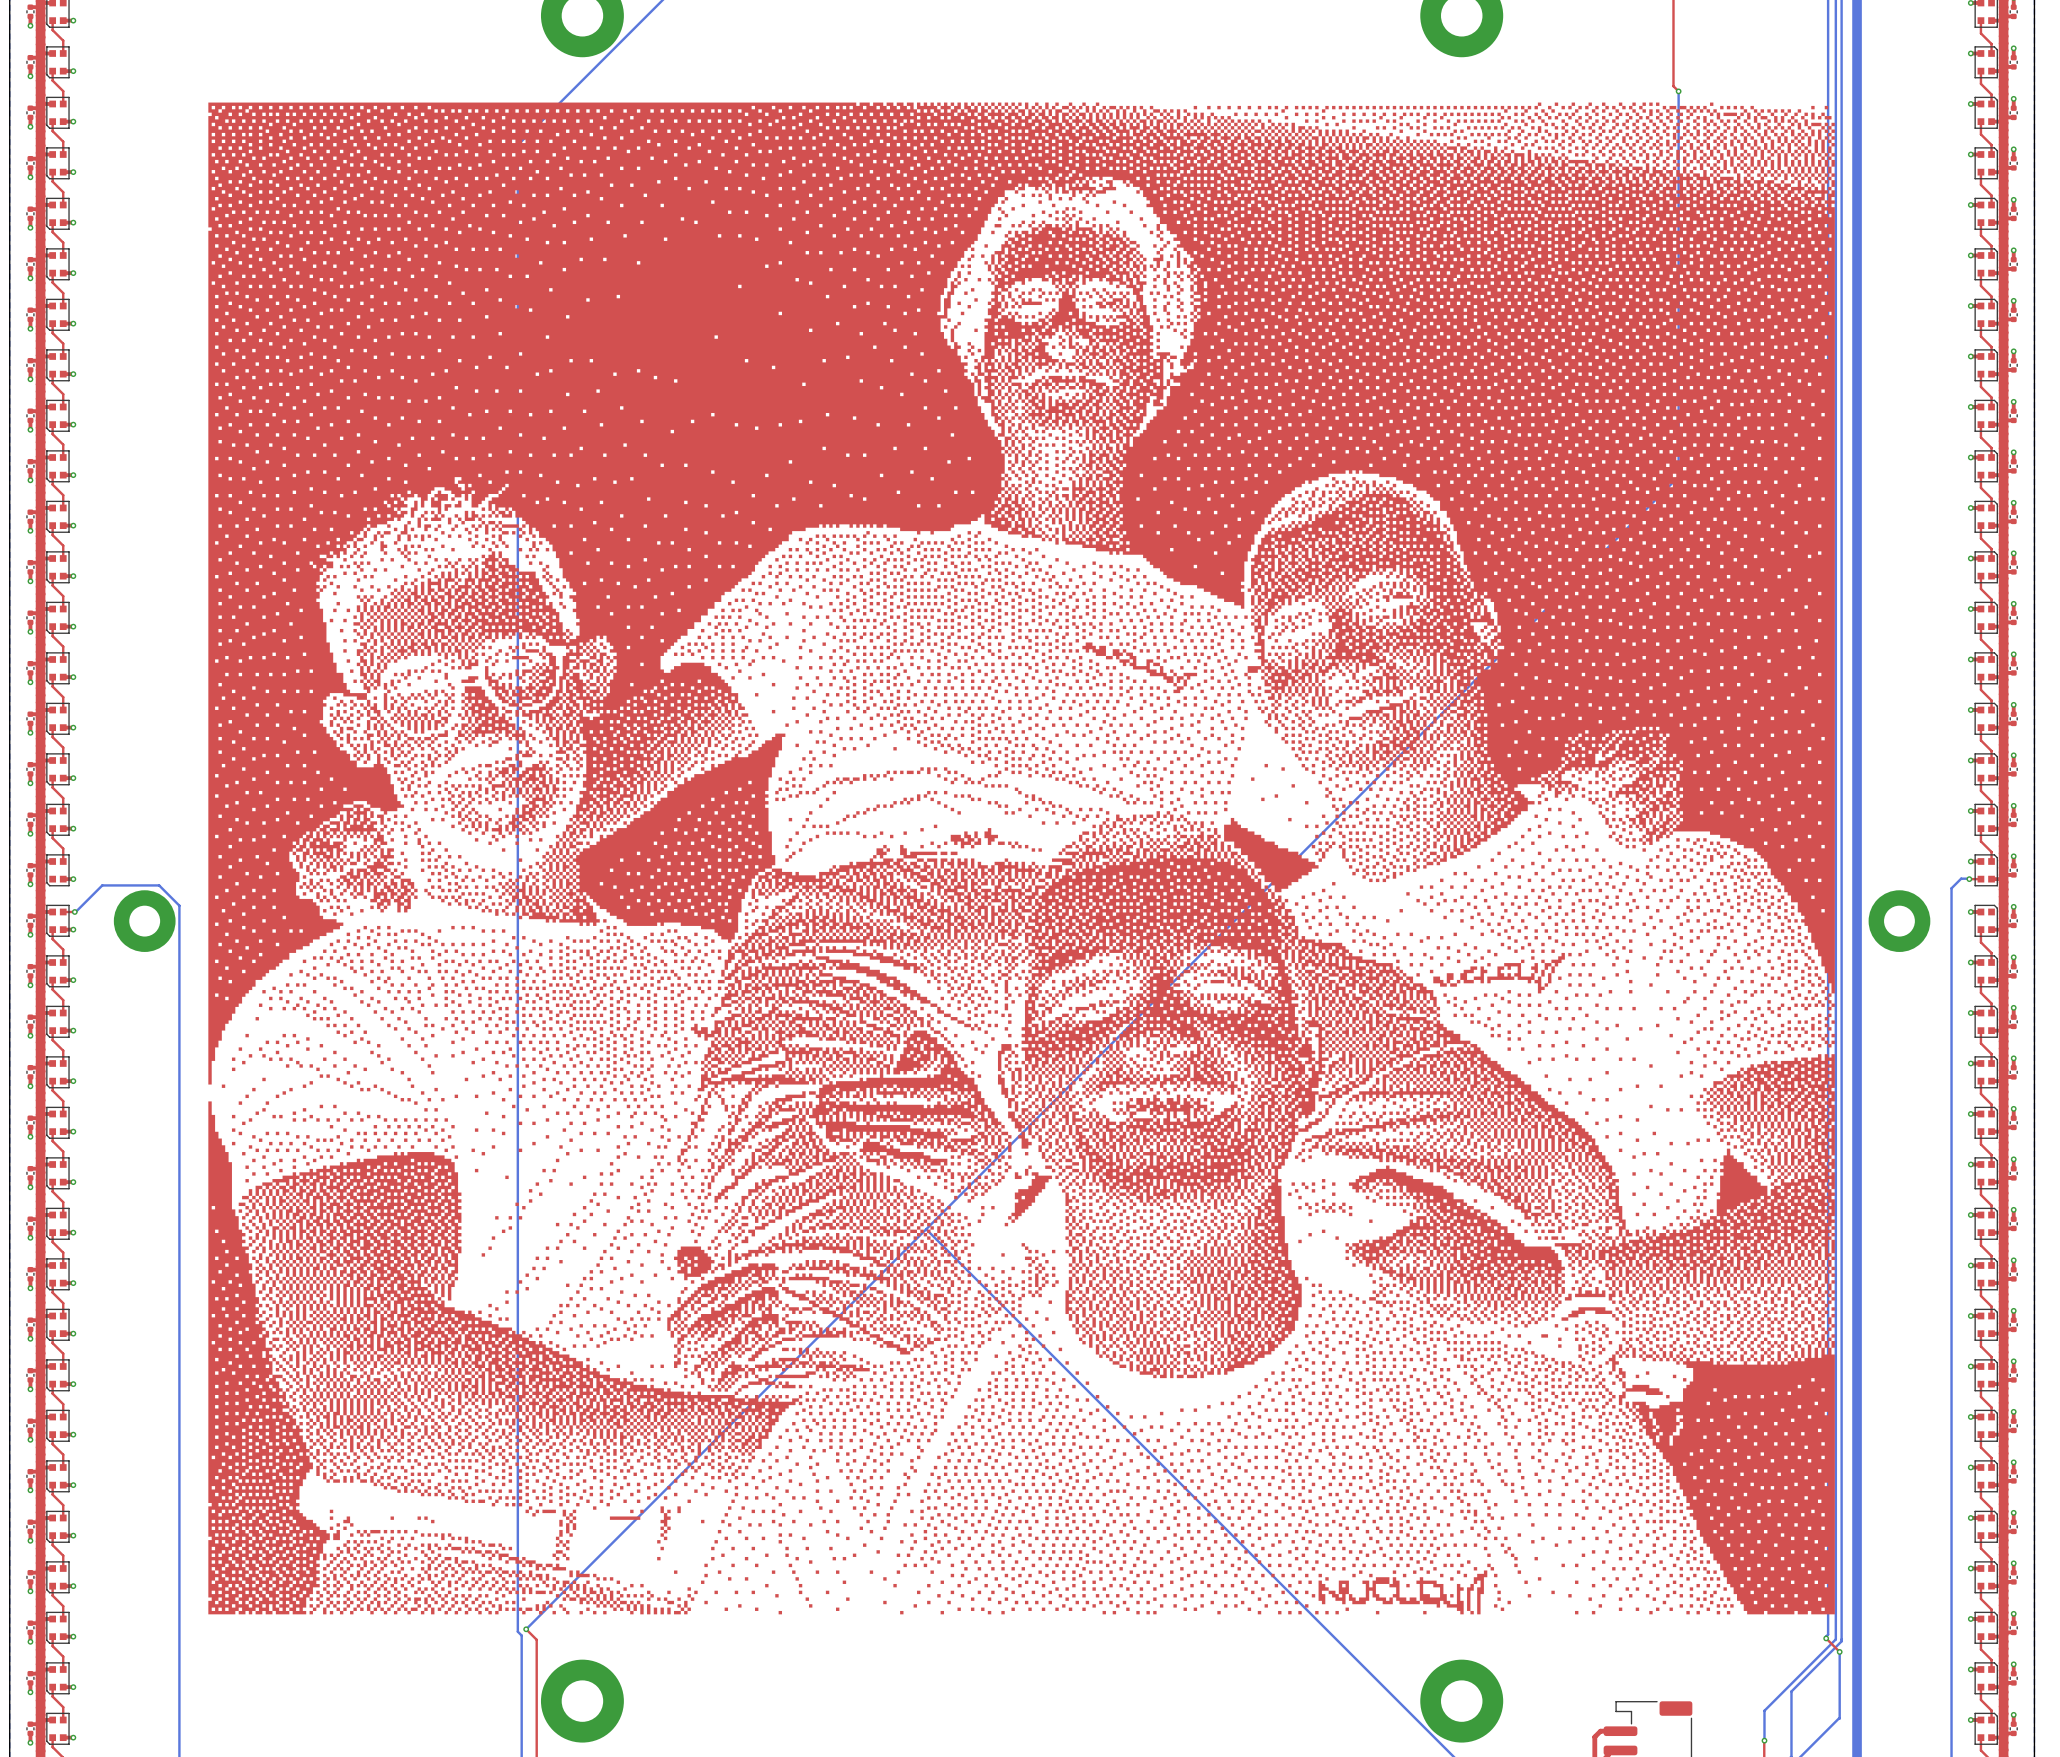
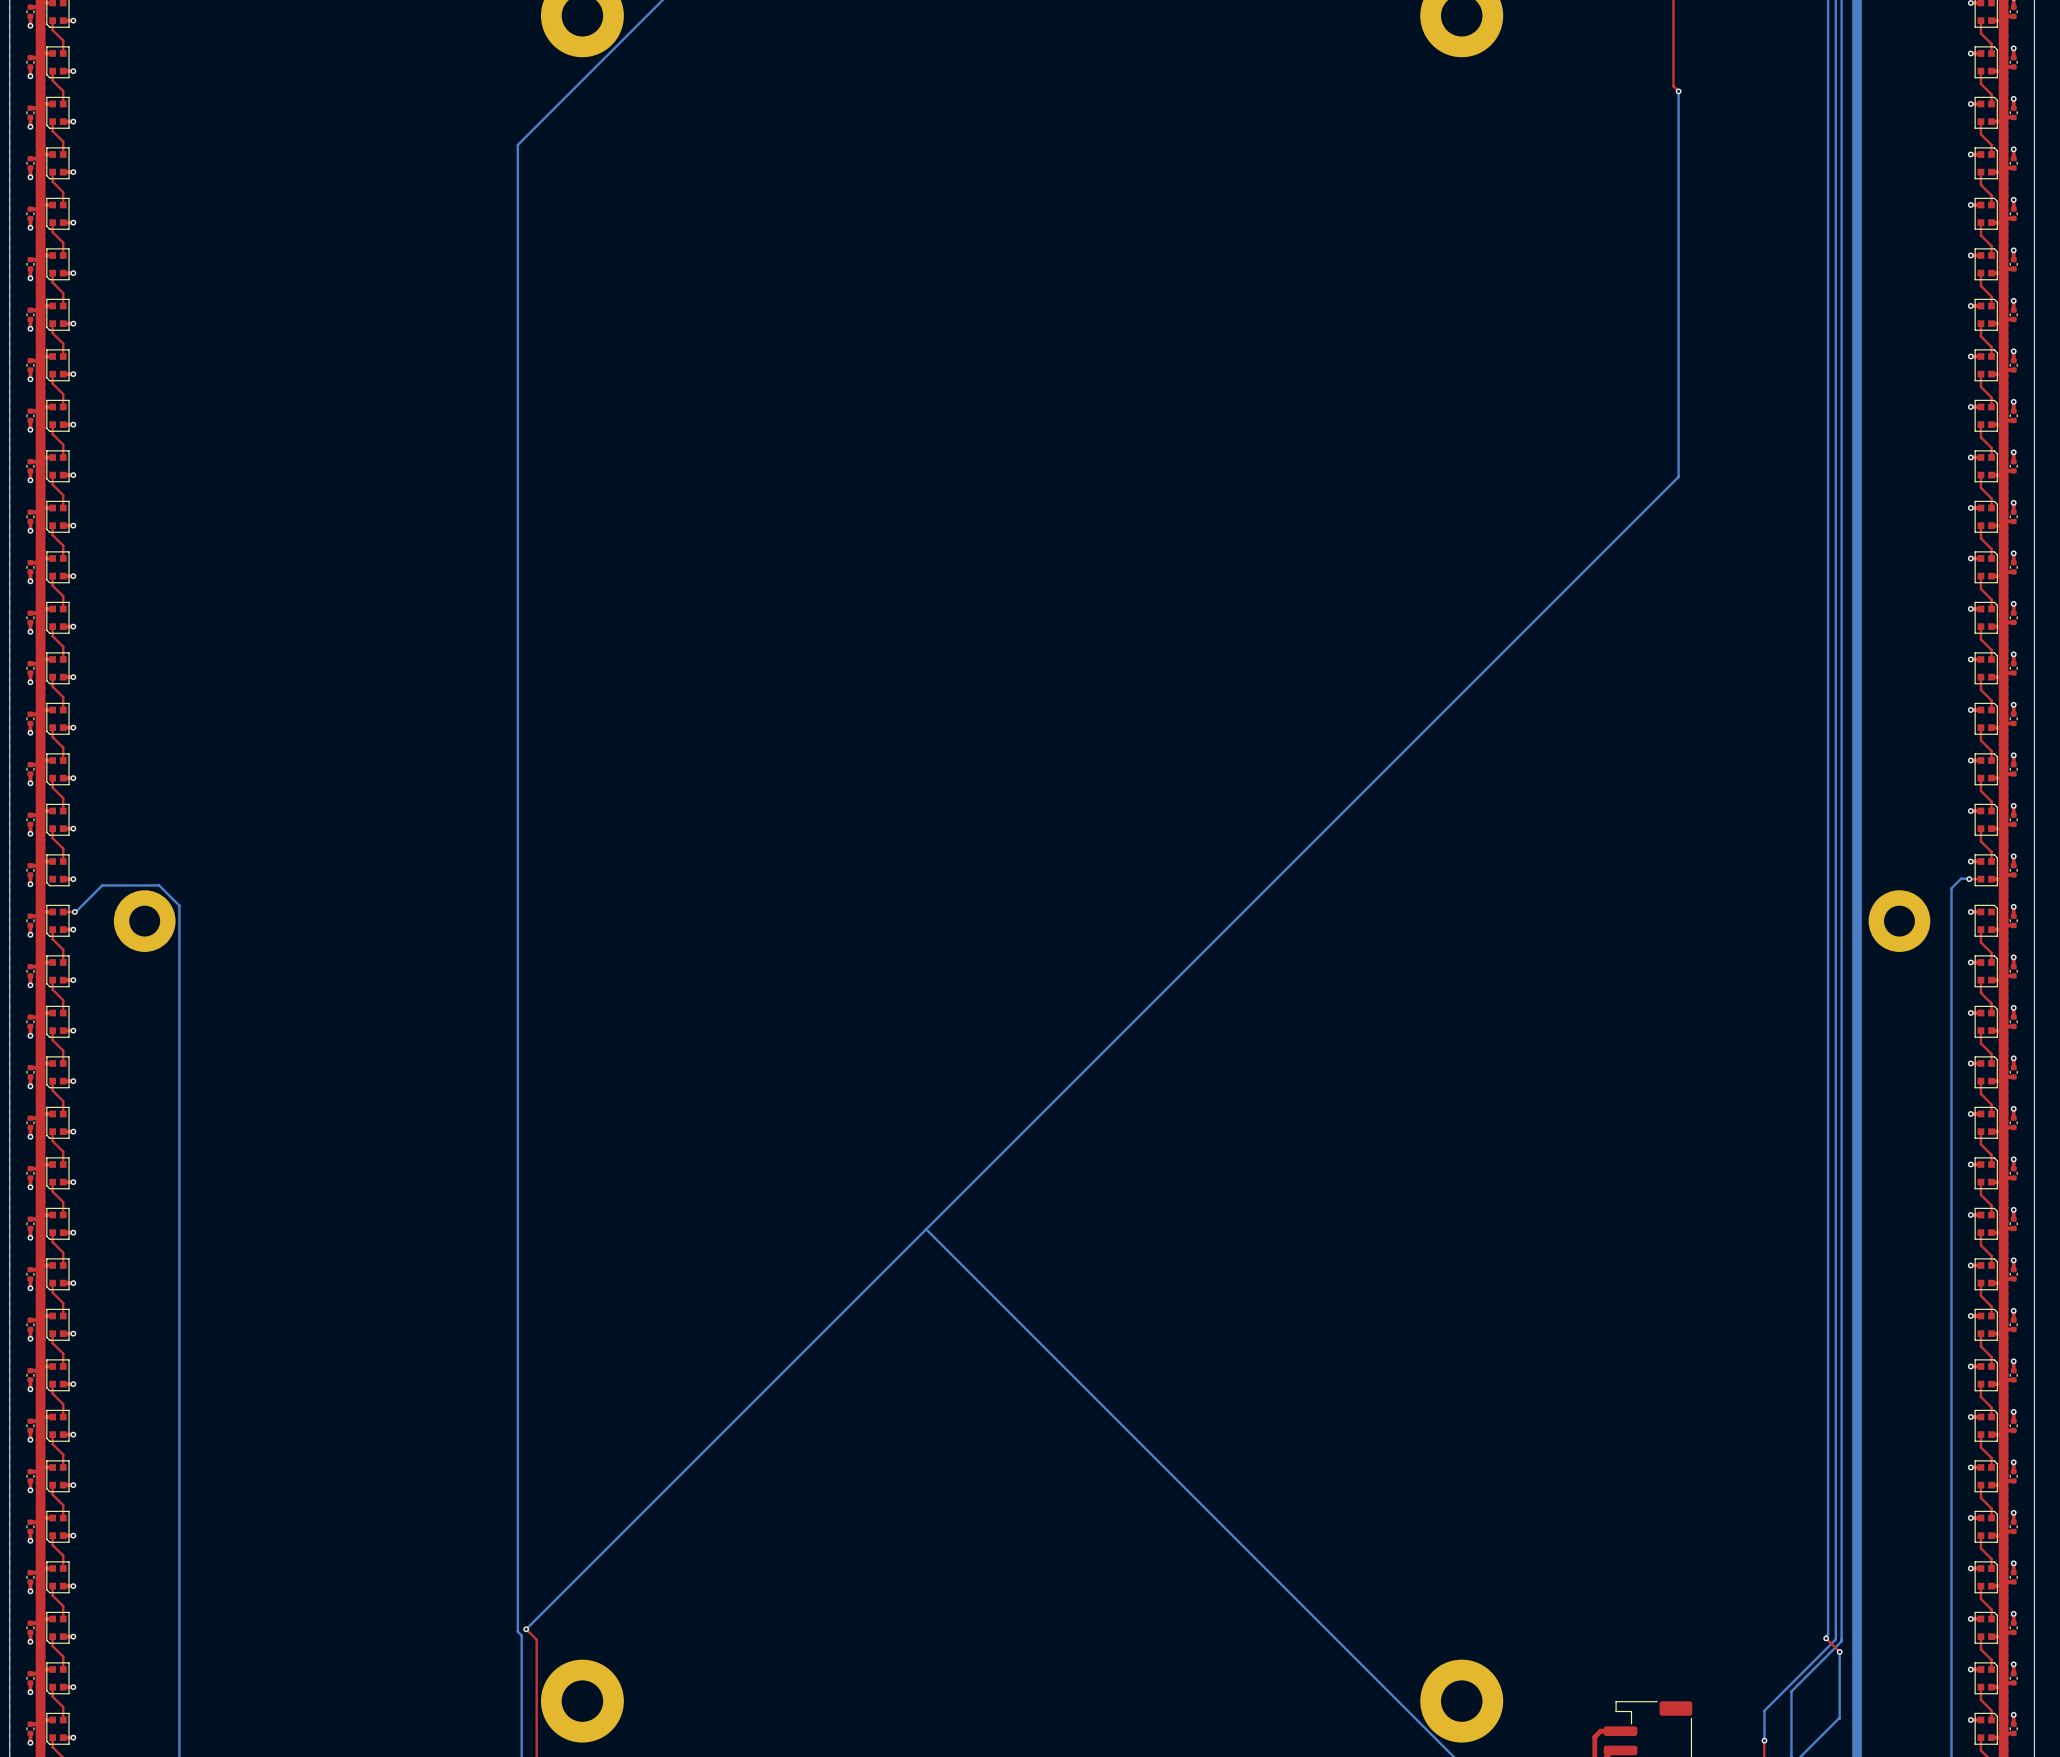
drawing: [208, 102, 1835, 1615] -> none

